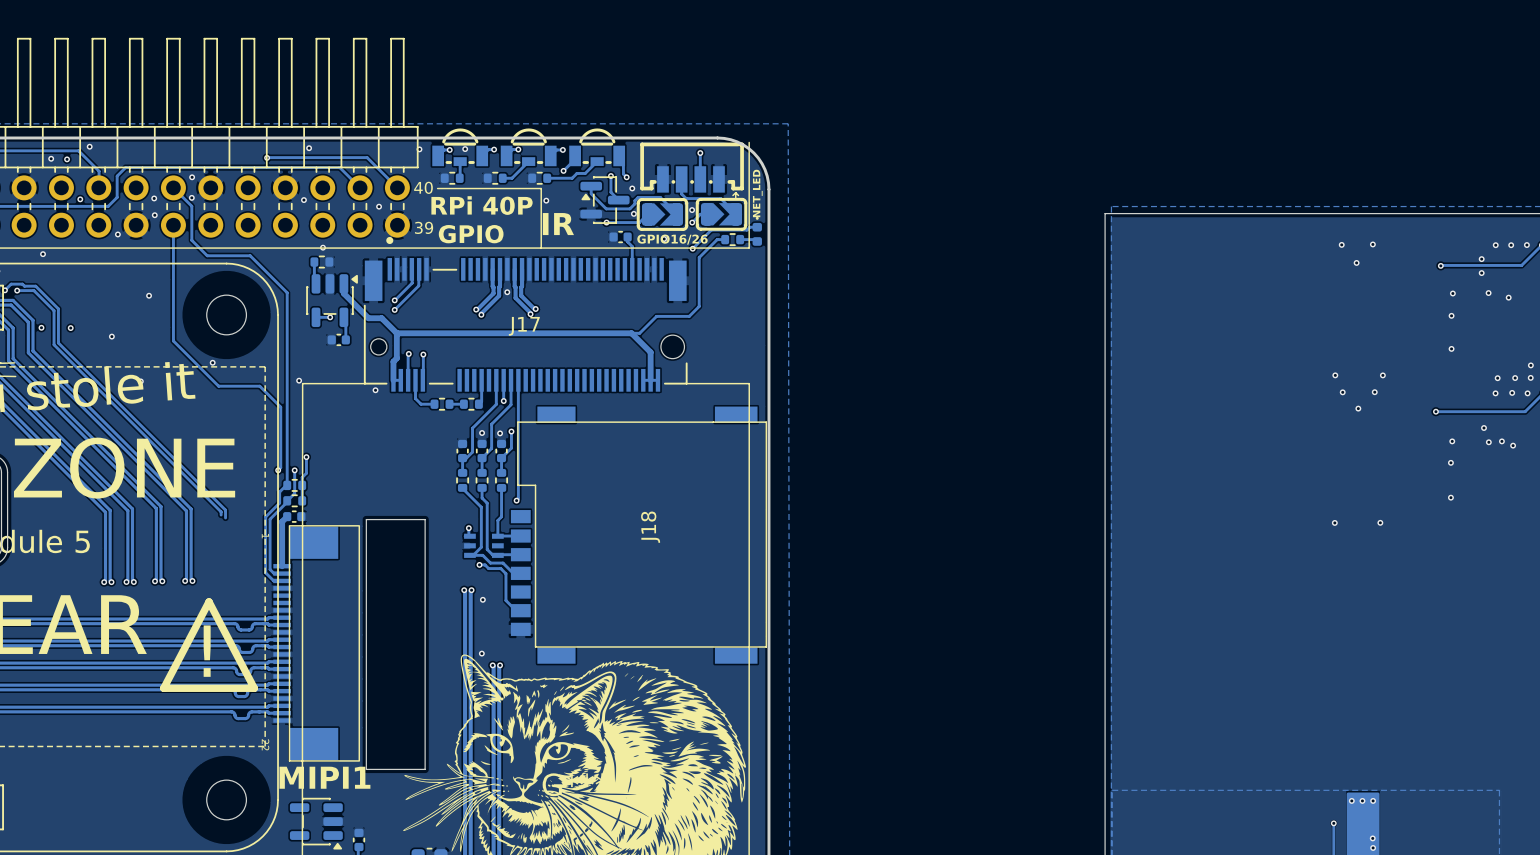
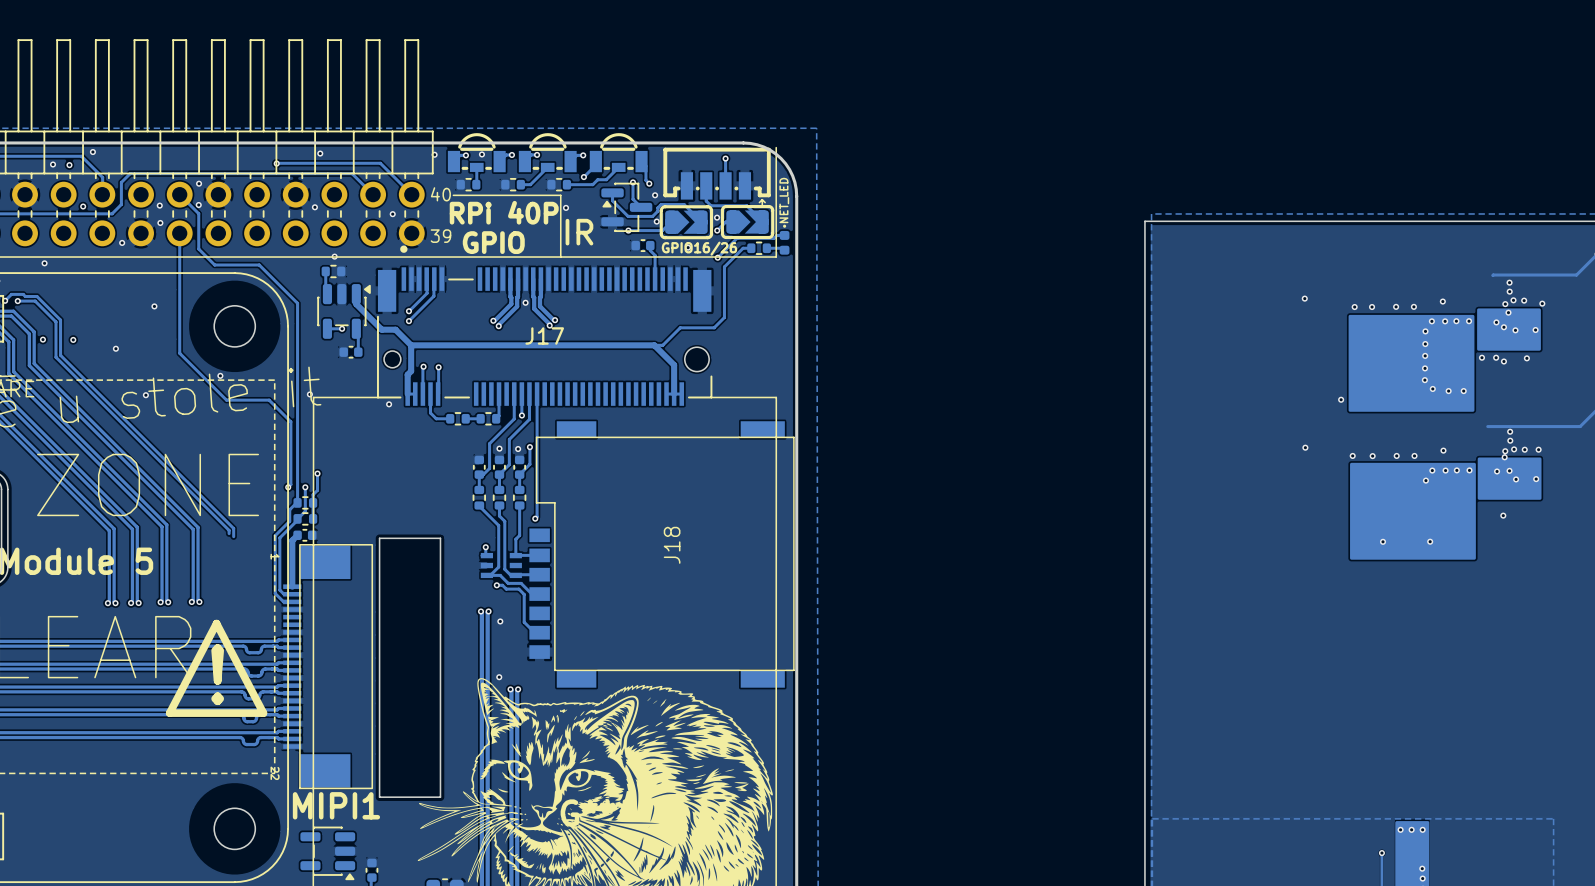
via: (1341, 244) -> none
via: (1372, 244) -> none
via: (1495, 245) -> none
via: (1511, 245) -> none
via: (1526, 245) -> none
via: (1481, 259) -> none
via: (1356, 262) -> none
via: (1440, 265) -> none
via: none -> (1509, 282)
via: (1481, 273) -> none
via: none -> (1509, 291)
via: none -> (1304, 298)
via: none -> (1513, 300)
via: none -> (1524, 300)
via: none -> (1442, 301)
via: none -> (1354, 307)
via: none -> (1372, 307)
via: none -> (1396, 306)
via: none -> (1413, 306)
drawing: none -> [1348, 308, 1541, 412]
via: (1508, 297) -> none
via: none -> (1508, 312)
via: none -> (1431, 321)
via: none -> (1445, 321)
via: none -> (1456, 321)
via: none -> (1469, 321)
via: none -> (1496, 322)
via: none -> (1515, 330)
via: none -> (1535, 330)
via: none -> (1425, 331)
via: none -> (1425, 344)
via: none -> (1425, 355)
via: none -> (1481, 357)
via: none -> (1496, 357)
via: none -> (1526, 358)
via: none -> (1425, 368)
via: (1530, 365) -> none
via: none -> (1424, 380)
via: (1335, 375) -> none
via: none -> (1448, 391)
via: none -> (1463, 391)
via: (1530, 377) -> none
via: (1497, 378) -> none
via: (1515, 378) -> none
via: none -> (1341, 399)
via: (1342, 392) -> none
via: (1374, 392) -> none
via: (1512, 392) -> none
via: (1495, 393) -> none
via: (1527, 393) -> none
via: (1358, 408) -> none
via: (1435, 411) -> none
via: none -> (1510, 431)
via: none -> (1510, 440)
via: (1483, 428) -> none
via: none -> (1305, 447)
via: none -> (1514, 449)
via: none -> (1443, 450)
via: none -> (1524, 449)
via: none -> (1538, 449)
via: none -> (1505, 451)
via: none -> (1352, 455)
via: none -> (1372, 456)
via: none -> (1396, 455)
via: none -> (1414, 455)
drawing: none -> [1350, 457, 1542, 560]
via: (1501, 441) -> none
via: (1488, 442) -> none
via: (1513, 445) -> none
via: none -> (1432, 470)
via: none -> (1445, 470)
via: none -> (1456, 470)
via: none -> (1469, 470)
via: none -> (1509, 470)
via: none -> (1497, 471)
via: (1450, 462) -> none
via: none -> (1516, 479)
via: none -> (1536, 479)
via: none -> (1425, 480)

